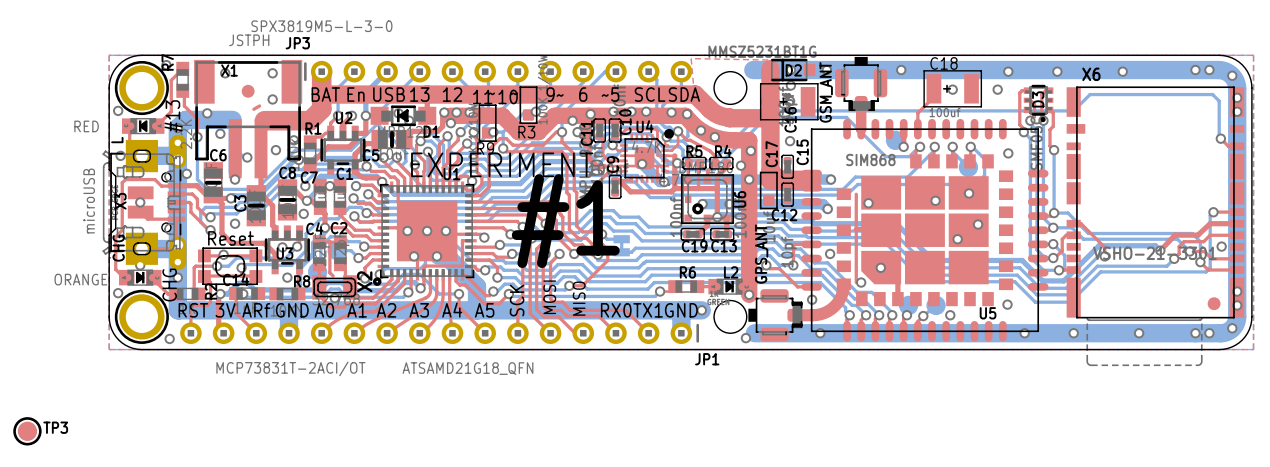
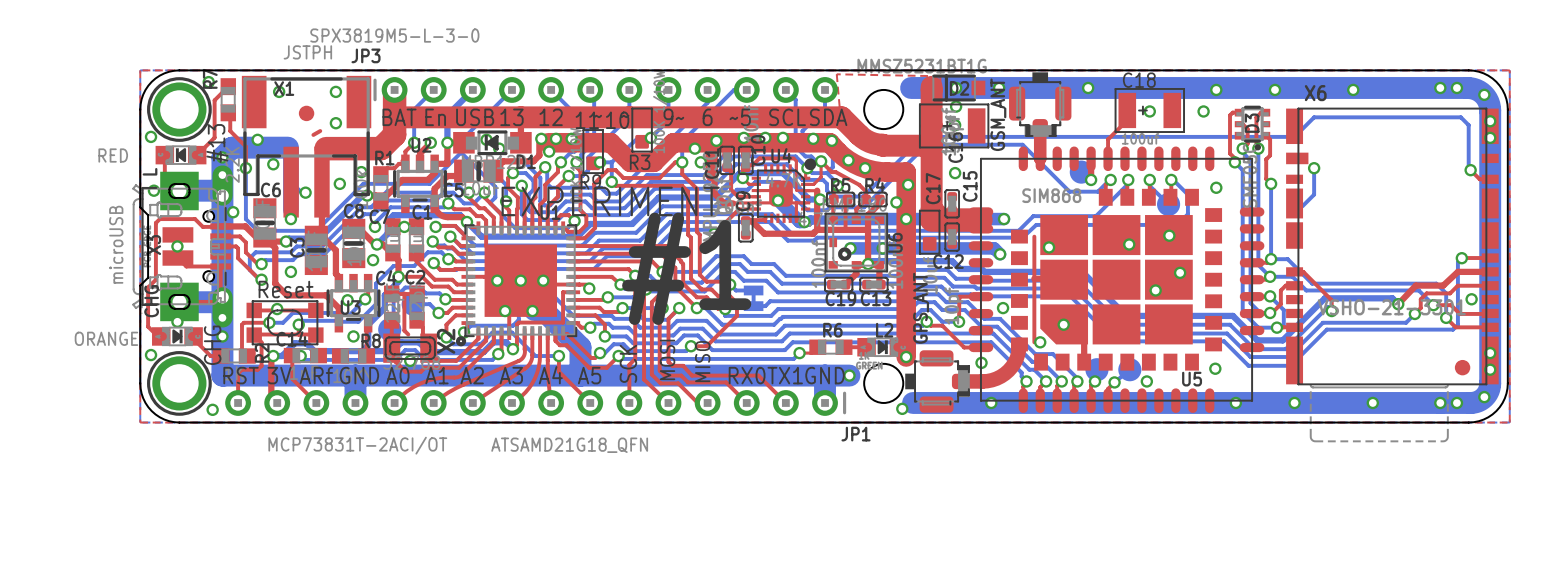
bottom track: none -> (1314, 168) (1314, 194) (1302, 206)
via: none -> (1314, 168)
TP3: (27, 431) -> none

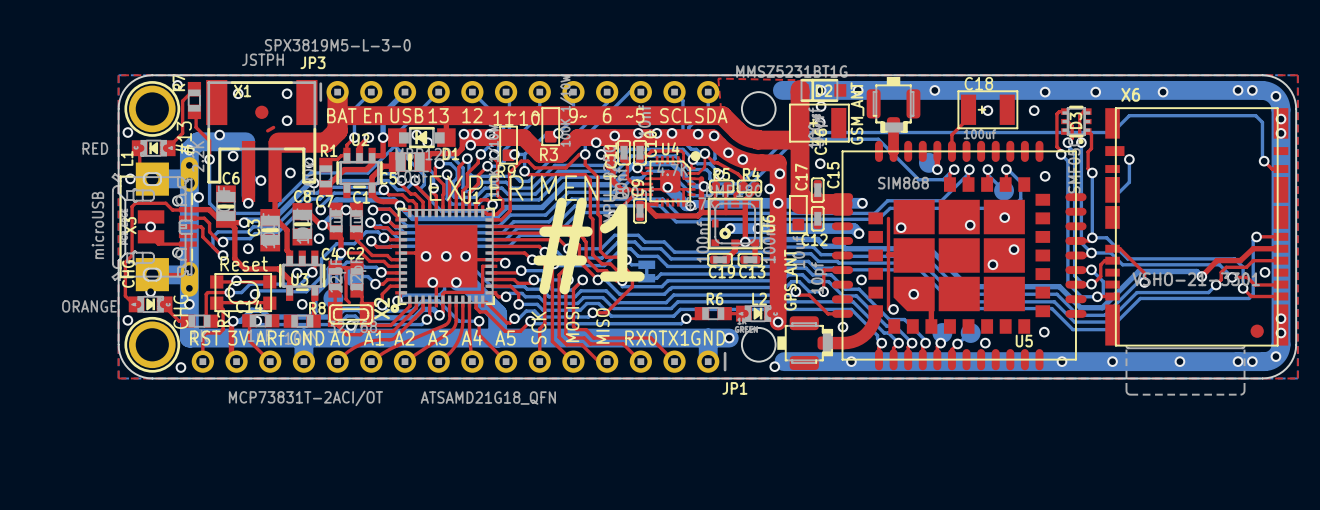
L name: L (150, 171) -> L1 (127, 158)

